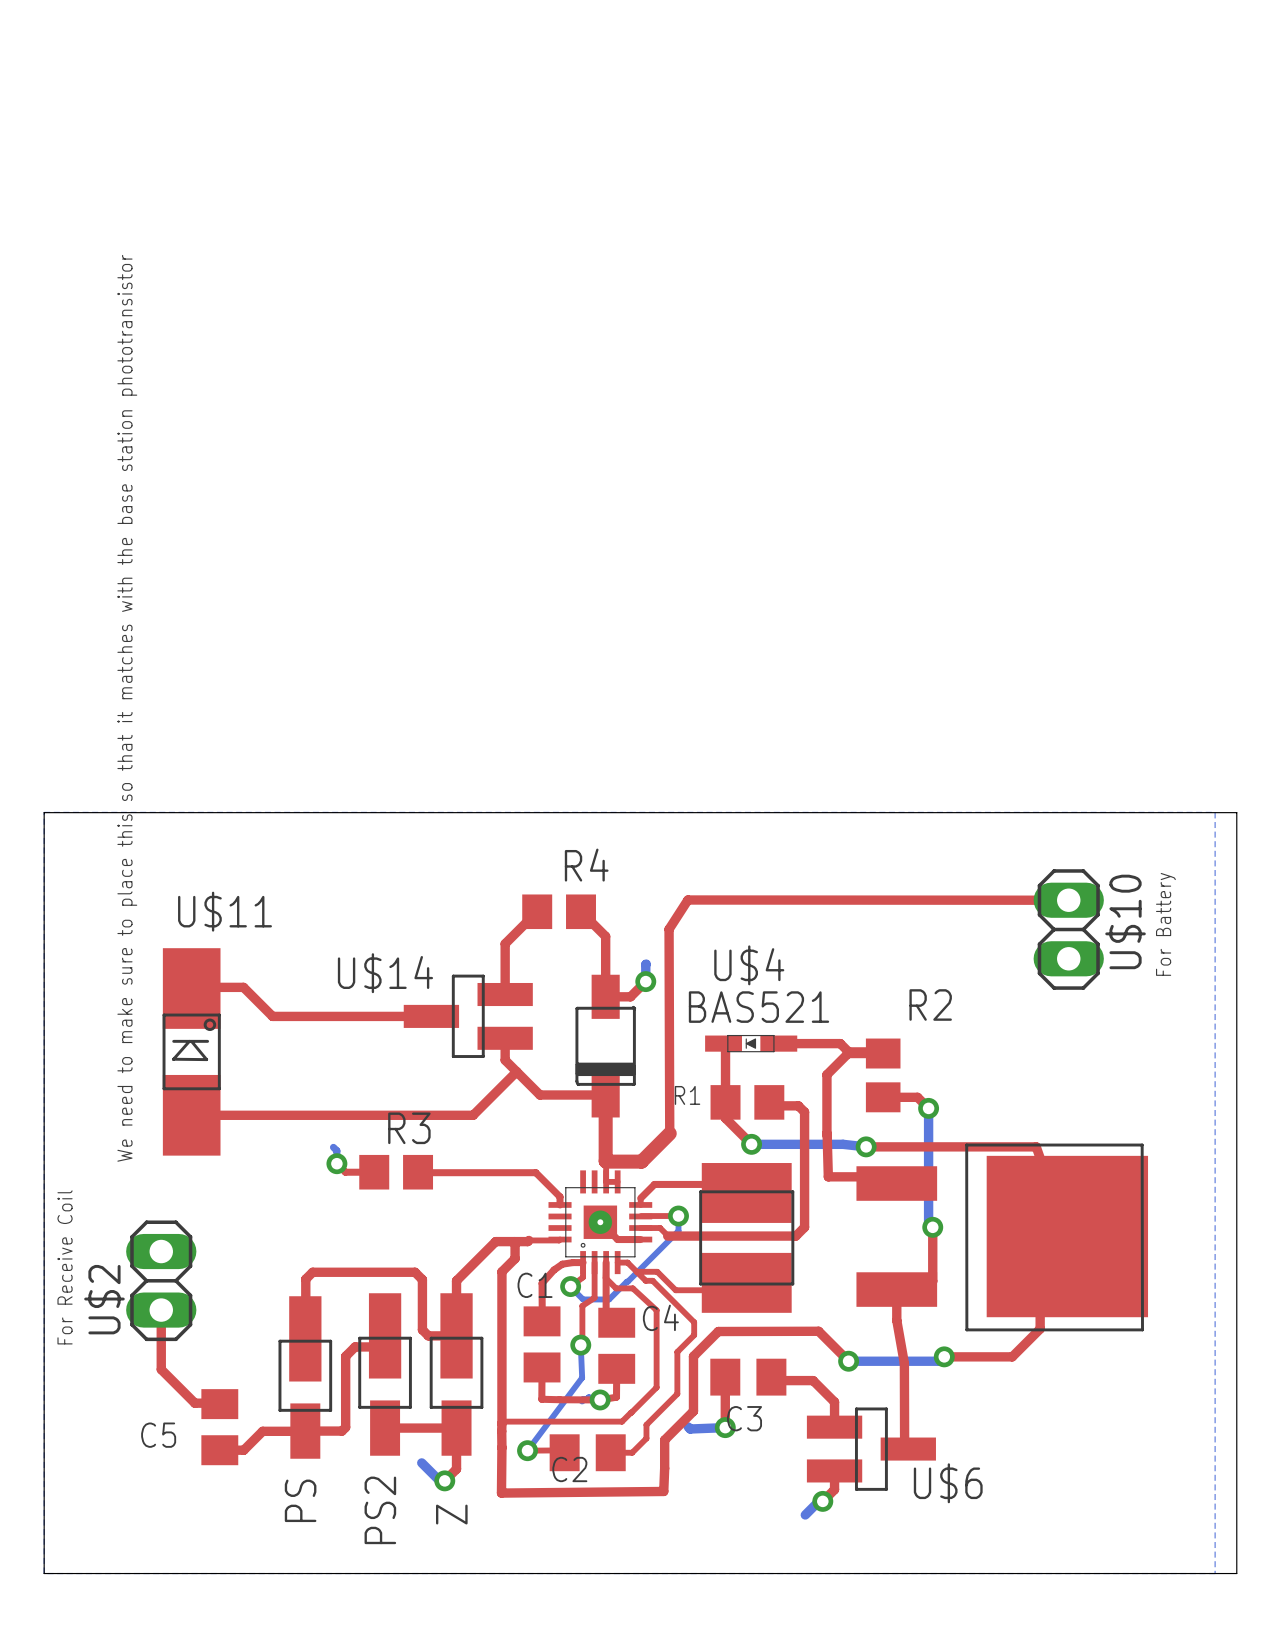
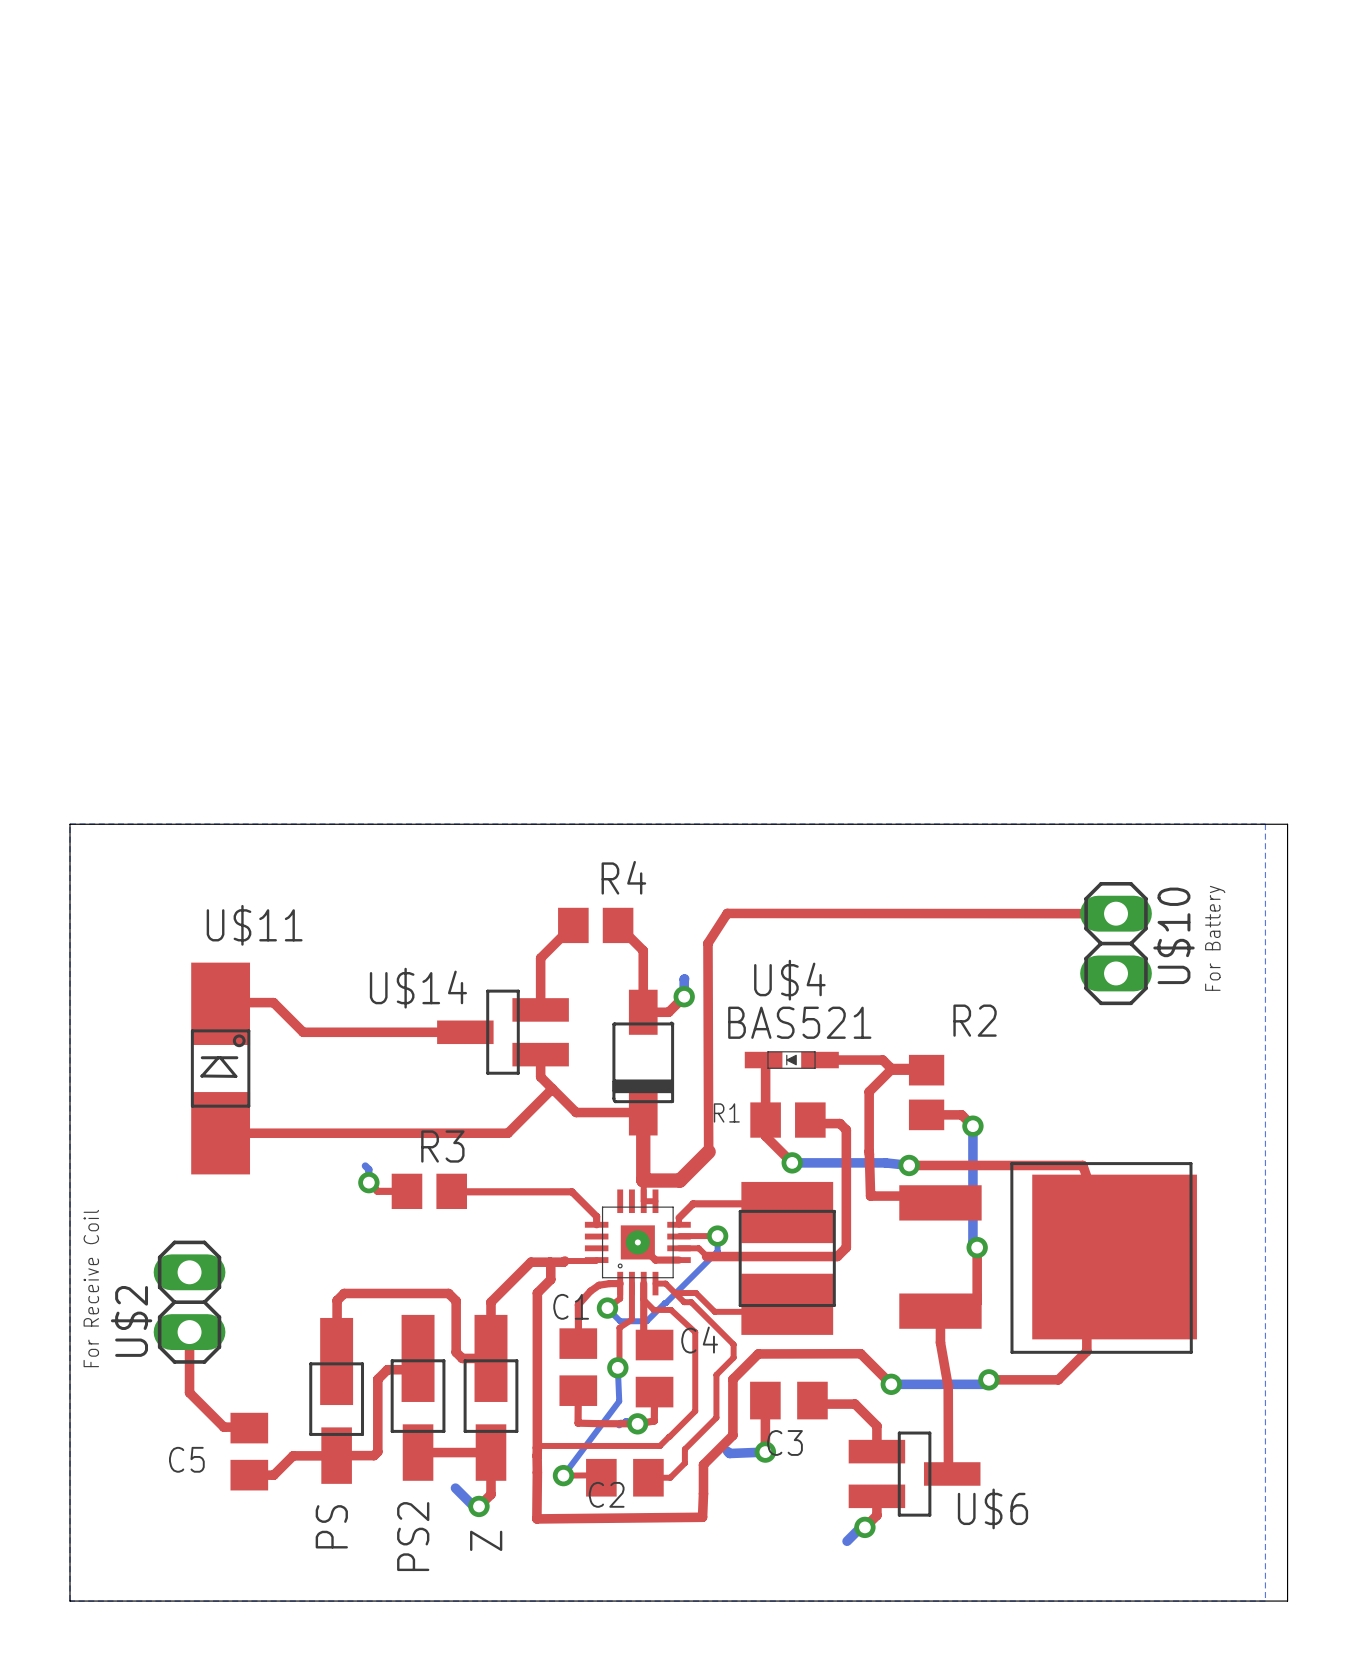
text: We need to make sure to place this so that it matches with the base station phototransistor (127, 708) -> none

